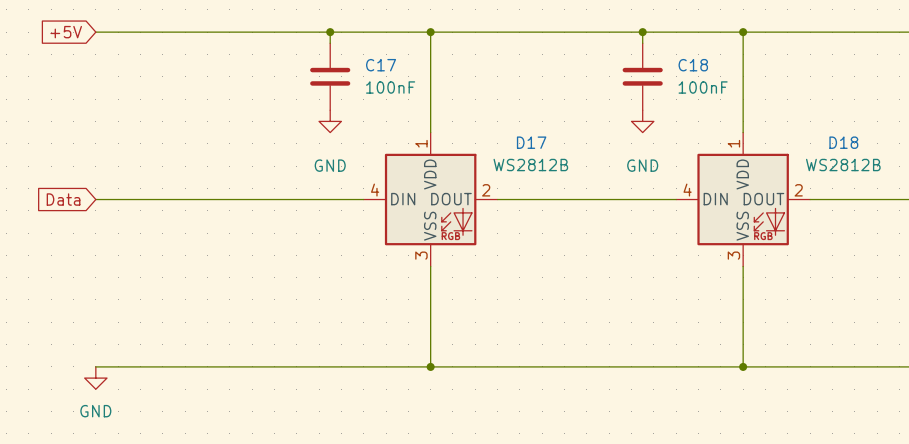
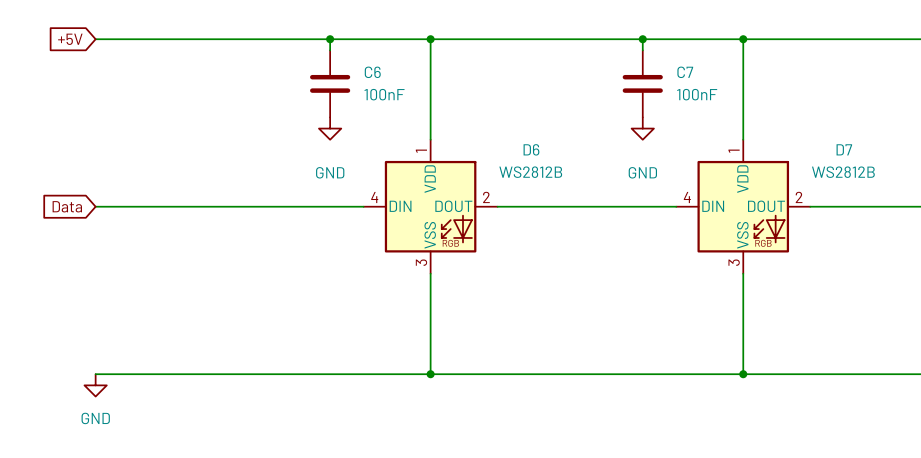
C17 name: C17 (381, 65) -> C6 (372, 72)
C18 name: C18 (693, 65) -> C7 (685, 72)
D17 name: D17 (531, 142) -> D6 (531, 149)
D18 name: D18 (843, 142) -> D7 (844, 149)

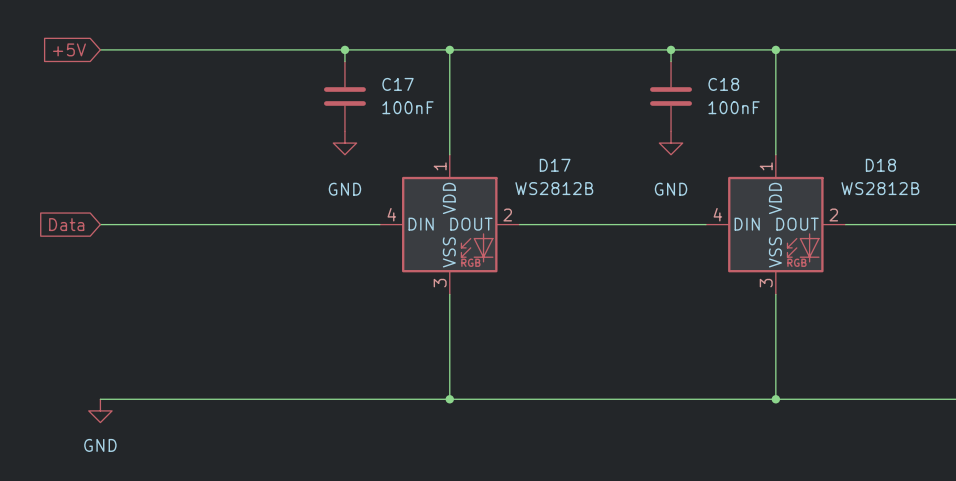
C6 name: C6 (372, 72) -> C17 (398, 84)
C7 name: C7 (685, 72) -> C18 (723, 84)
D6 name: D6 (531, 149) -> D17 (555, 165)
D7 name: D7 (844, 149) -> D18 (880, 165)

